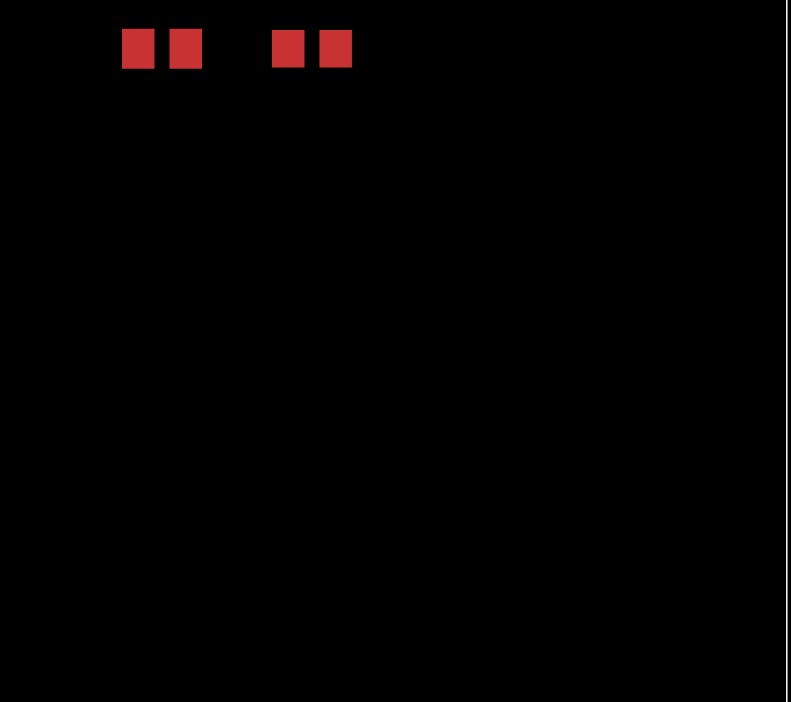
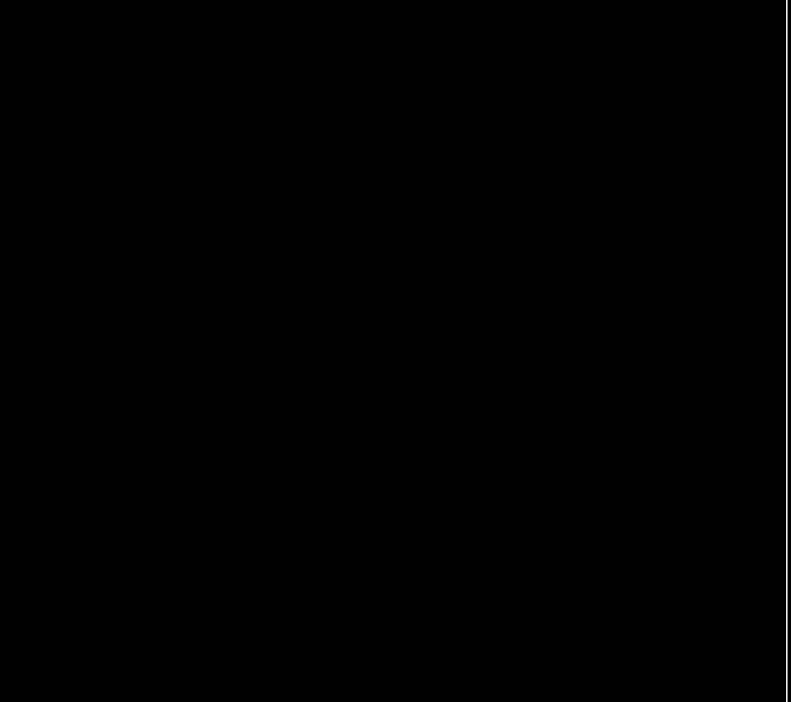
part: (162, 48) -> none
part: (311, 48) -> none

